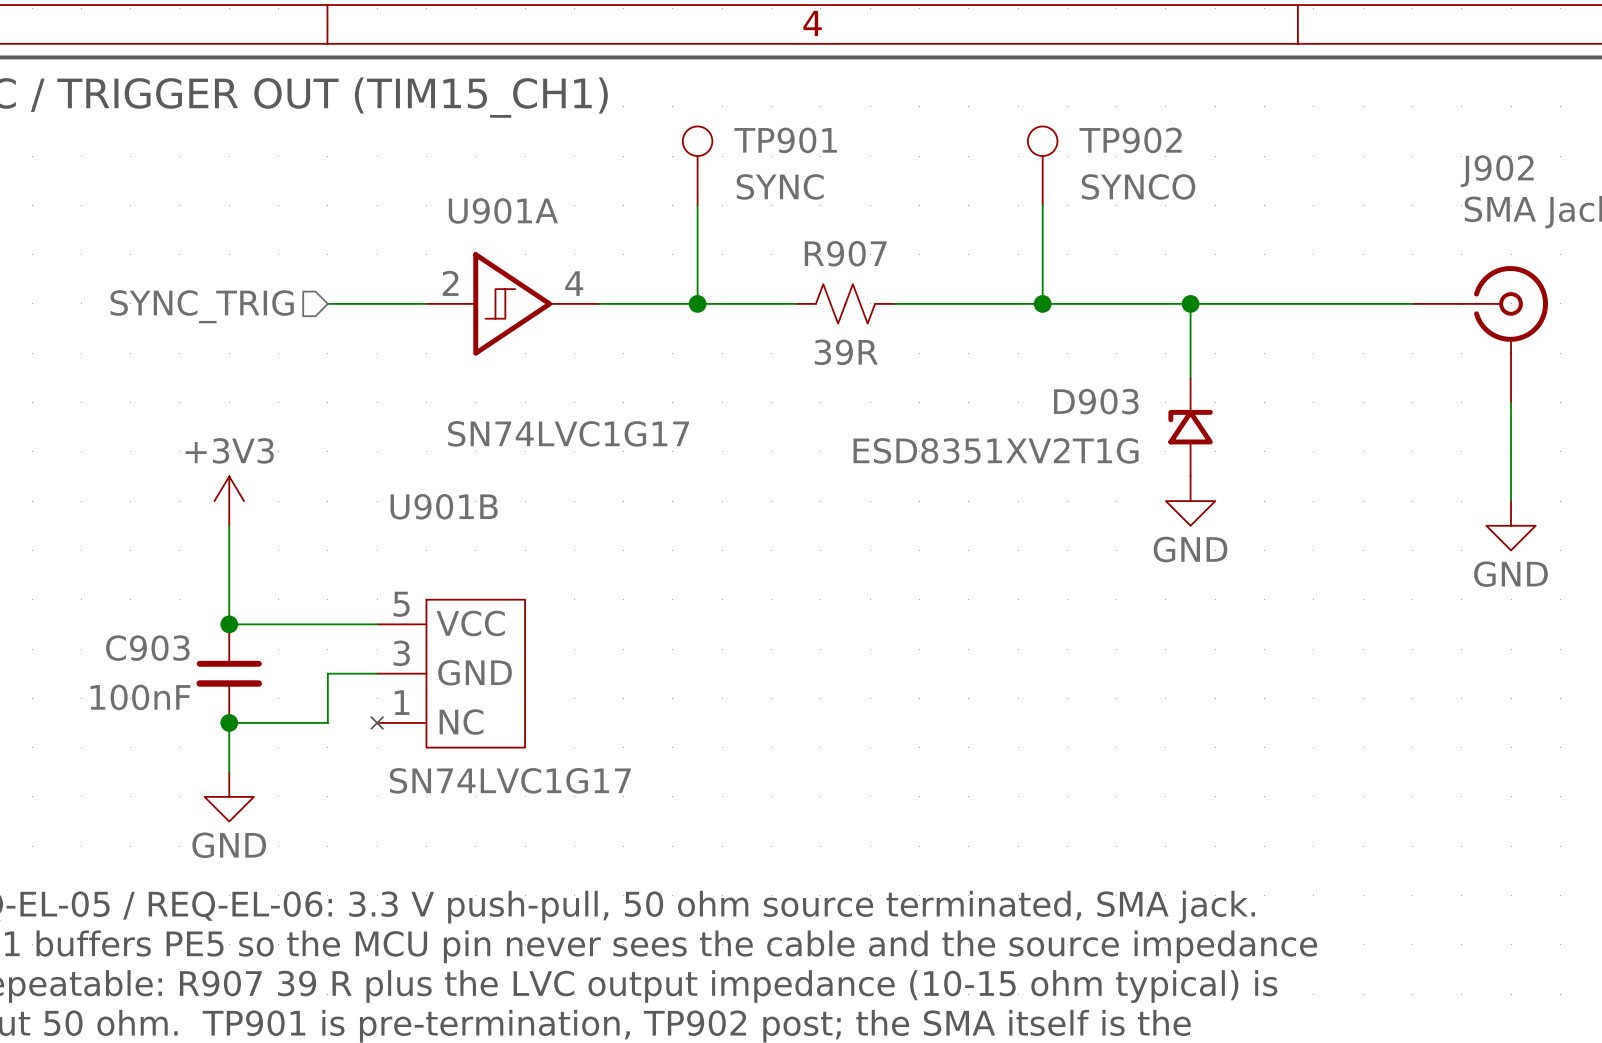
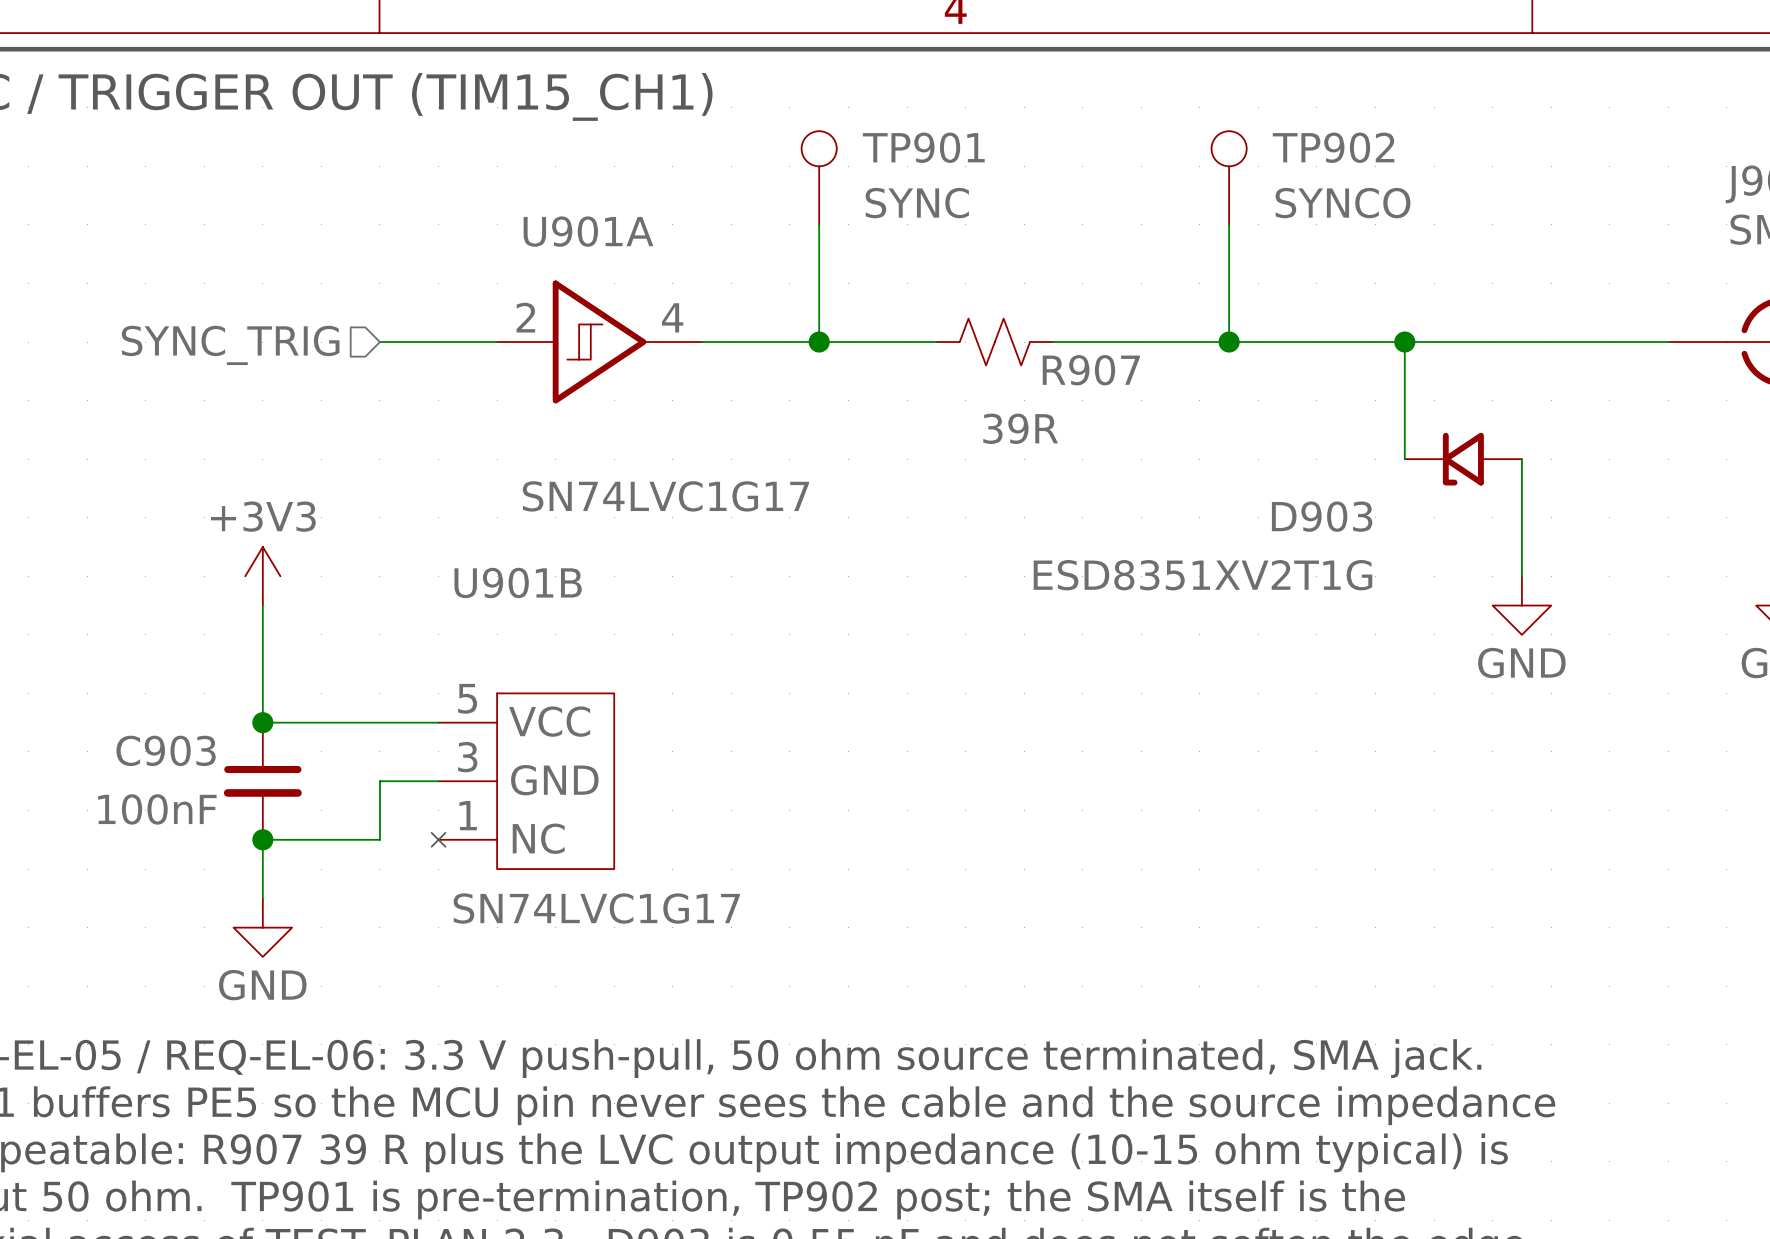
R907 name position: R907 (845, 253) -> R907 (1091, 370)
R907 value position: 39R (846, 352) -> 39R (1020, 428)
D903 name position: D903 (1096, 401) -> D903 (1322, 516)
wire: none -> (1521, 459) (1521, 576)
D903 rotation: 0° (1190, 427) -> 90° counterclockwise (1463, 459)
D903 value position: ESD8351XV2T1G (996, 450) -> ESD8351XV2T1G (1202, 575)
power symbol position: GND (1190, 501) -> GND (1521, 605)

